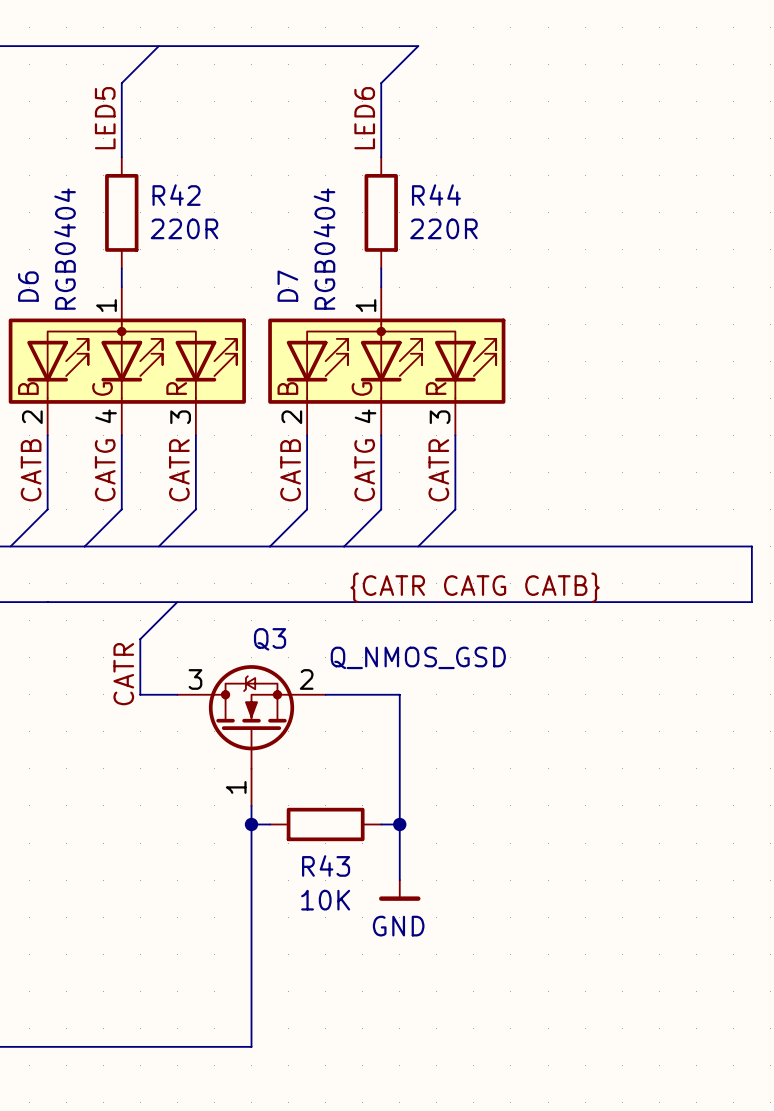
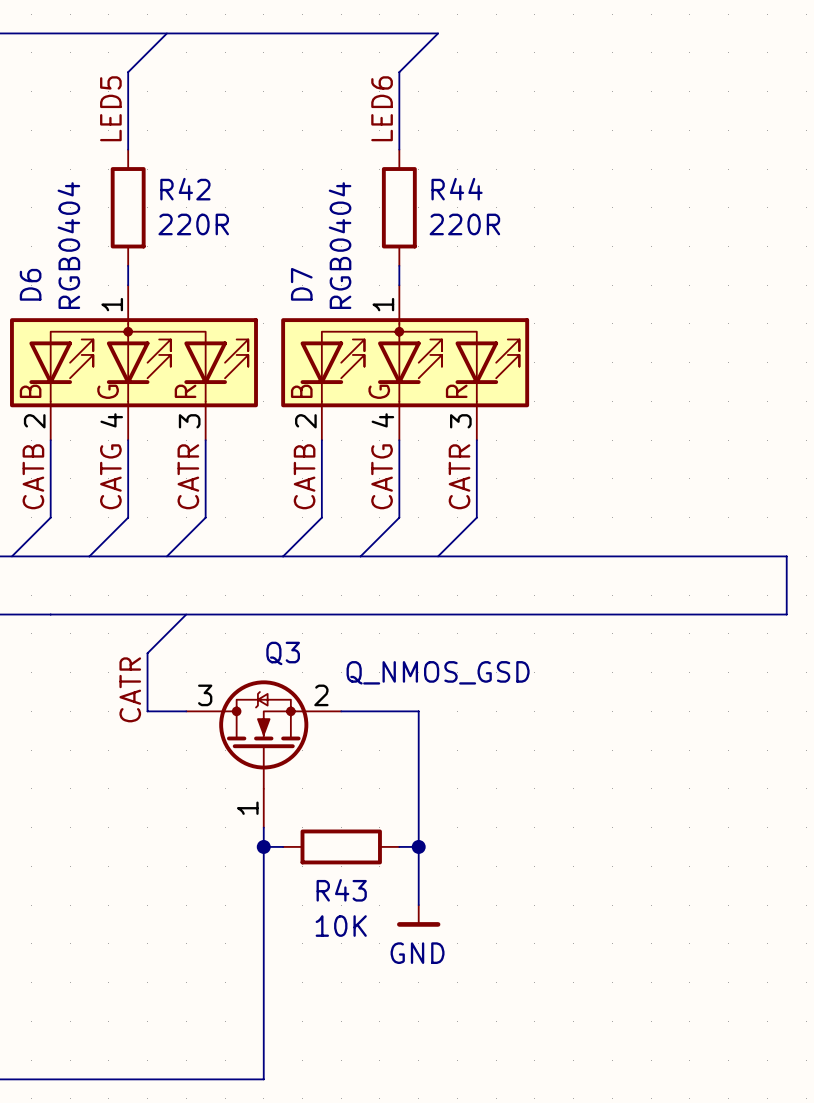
label: {CATR CATG CATB} (475, 587) -> none

